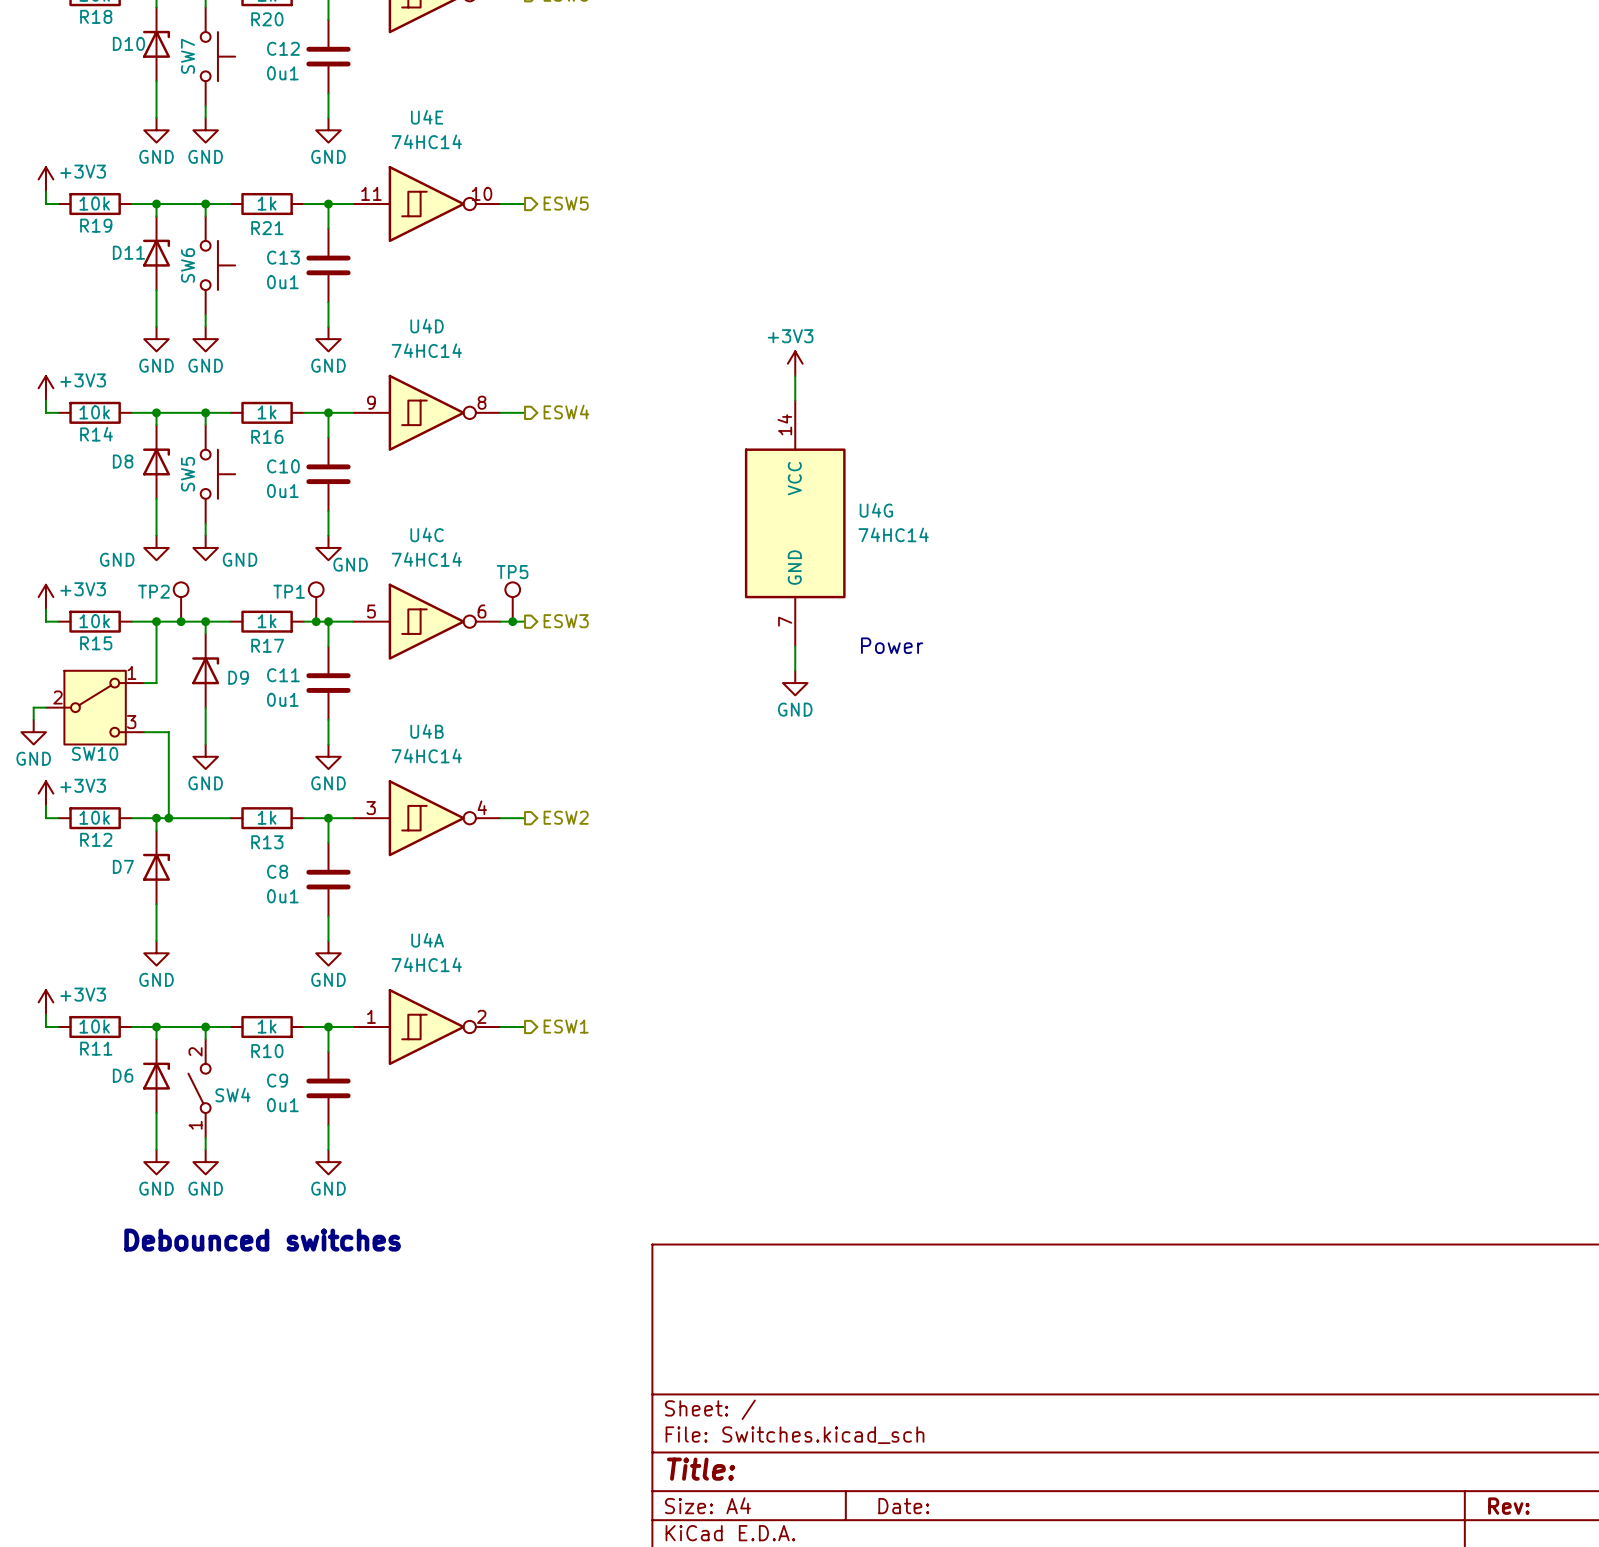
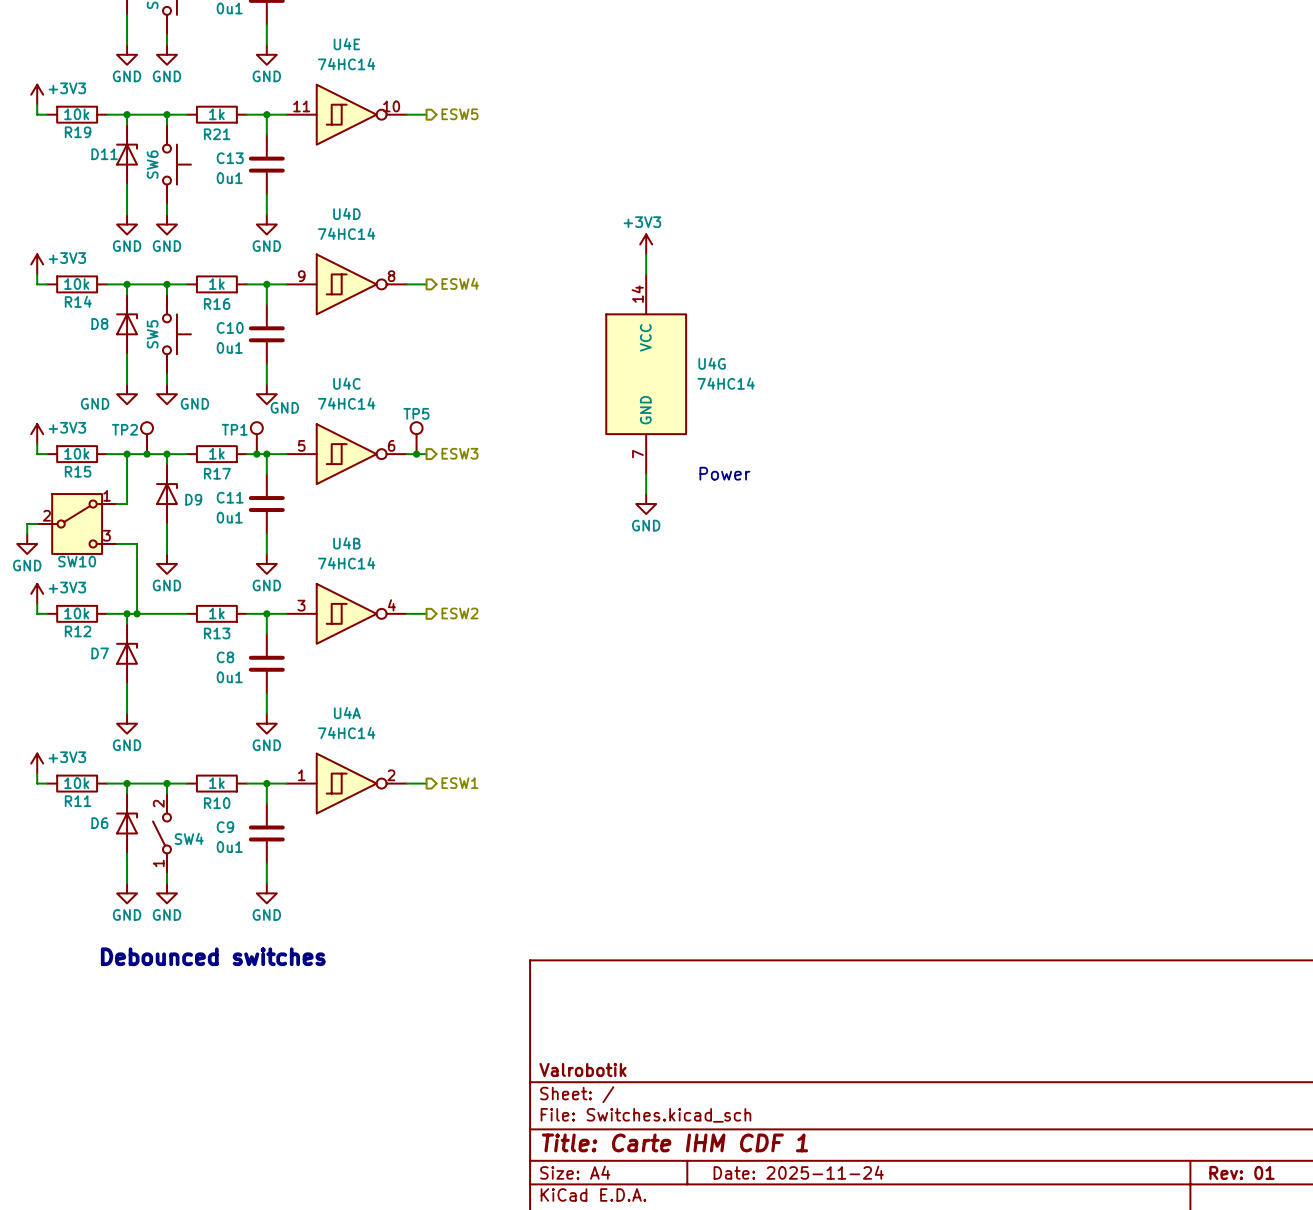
title block: none -> Valrobotik (583, 1069)
title block: Title: (701, 1469) -> Title: Carte IHM CDF 1 (675, 1142)
title block: Date: (903, 1506) -> Date: 2025-11-24 (798, 1172)
title block: Rev: (1508, 1506) -> Rev: 01 (1241, 1172)

